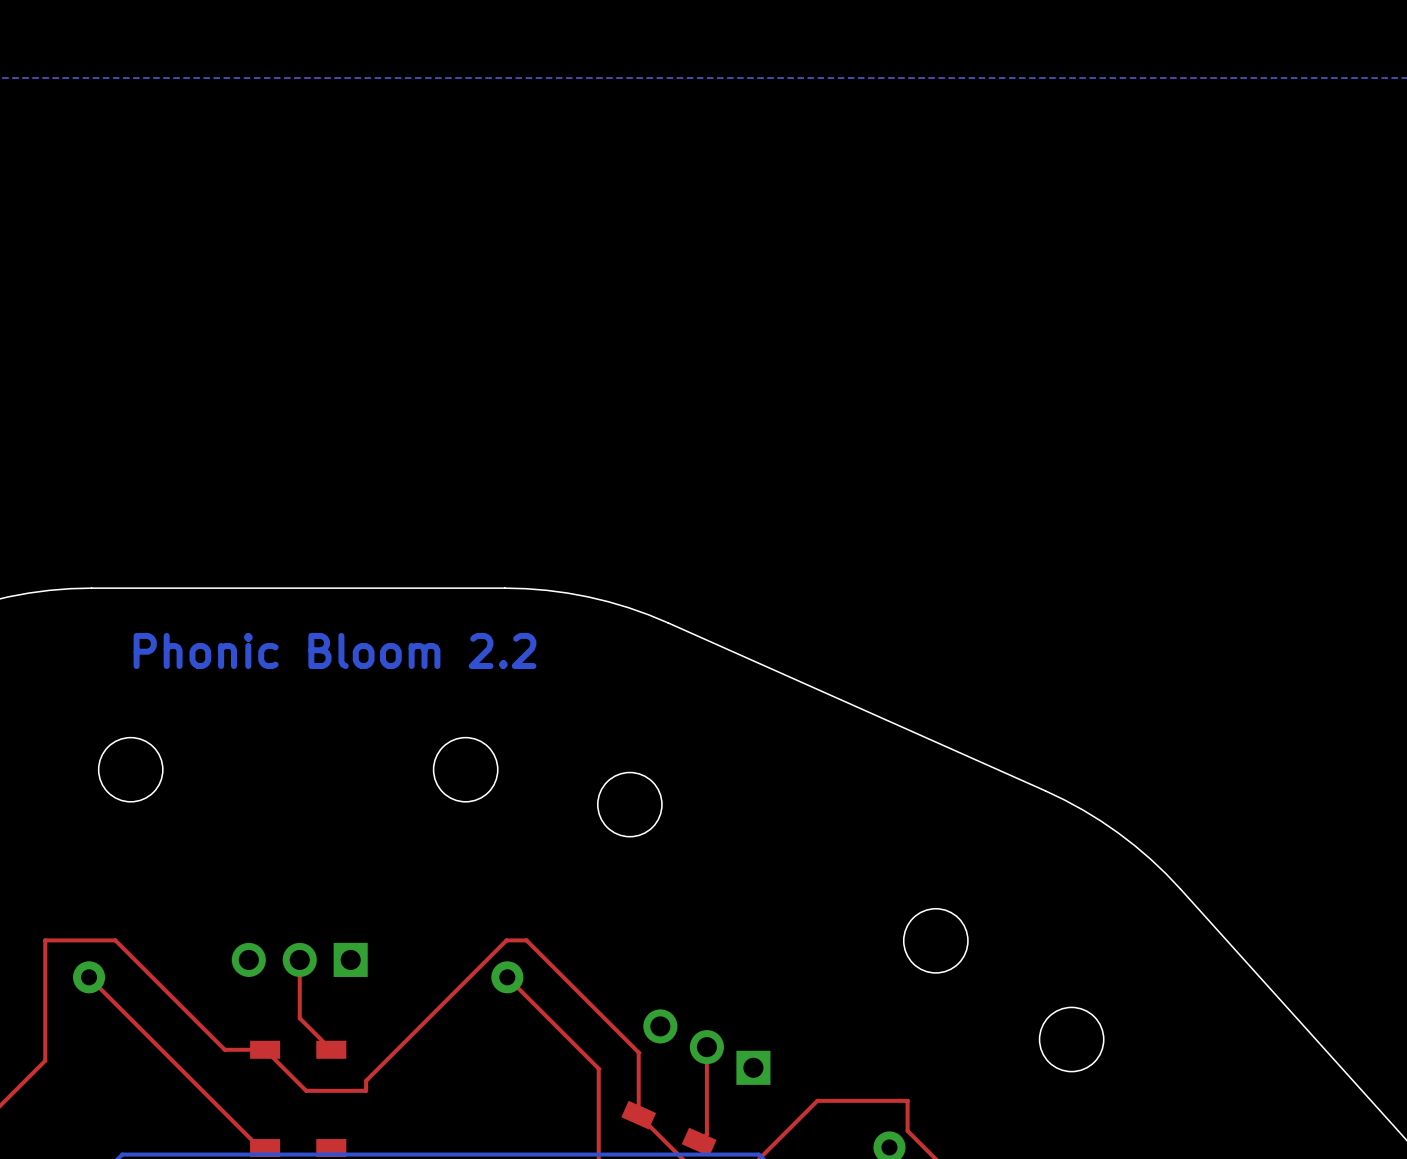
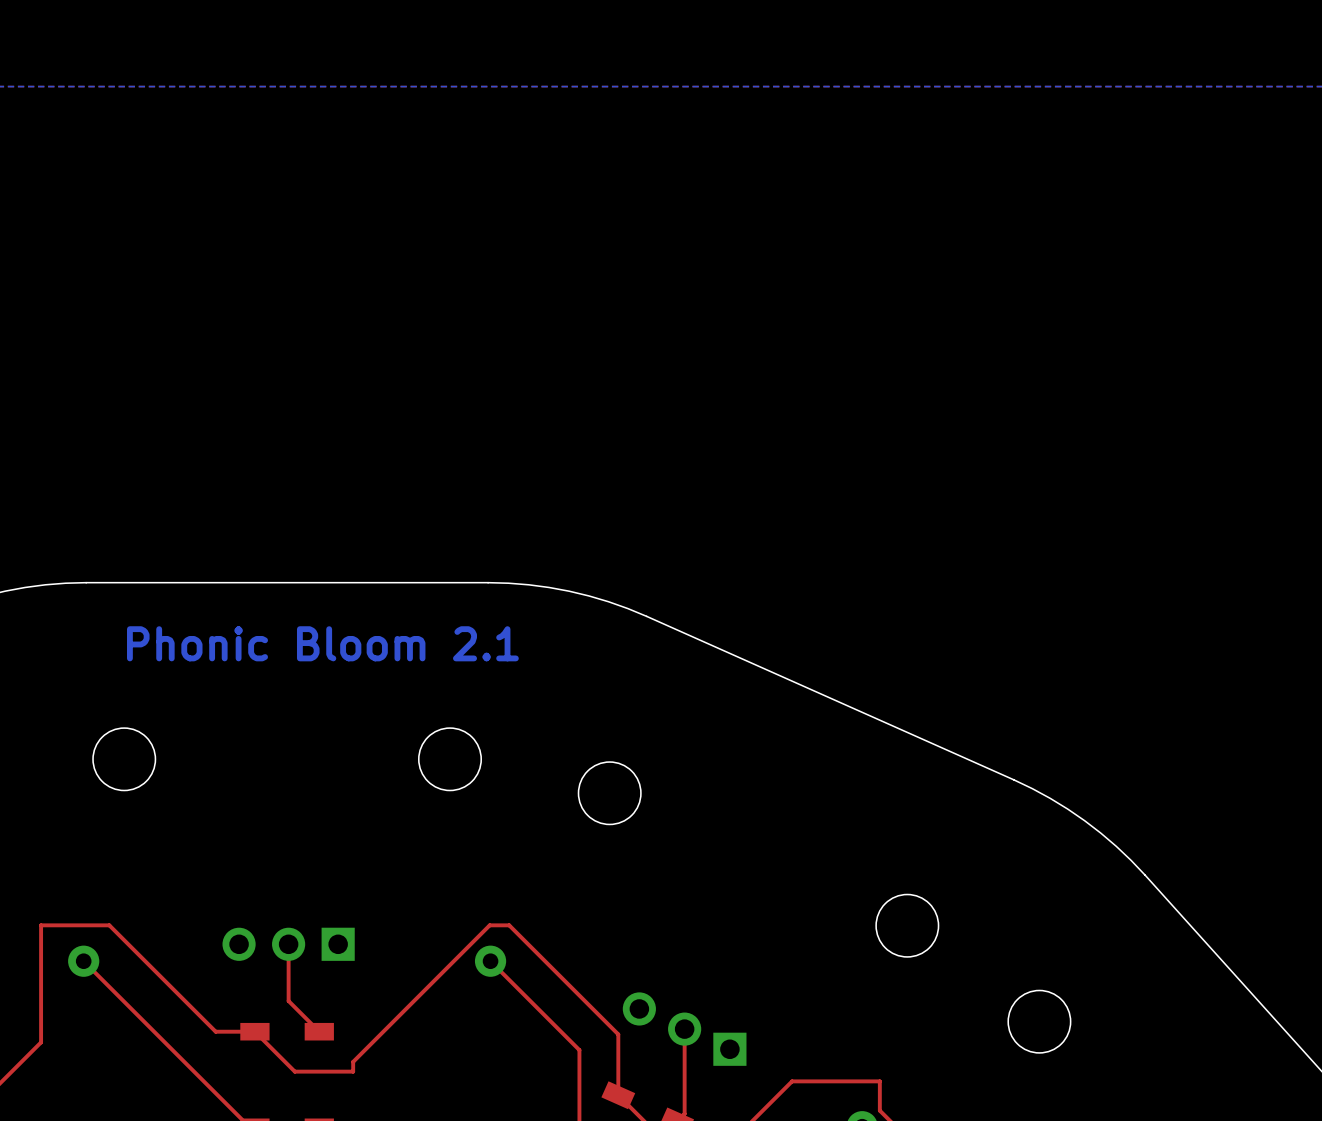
text: Phonic Bloom 2.2 (334, 650) -> Phonic Bloom 2.1 (322, 643)

